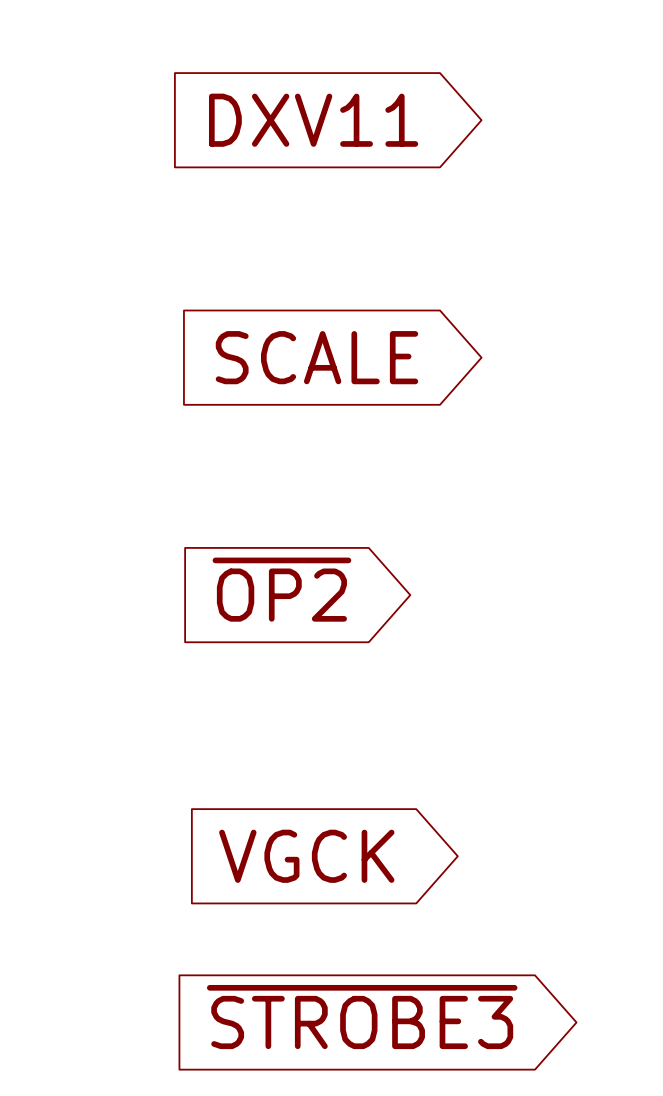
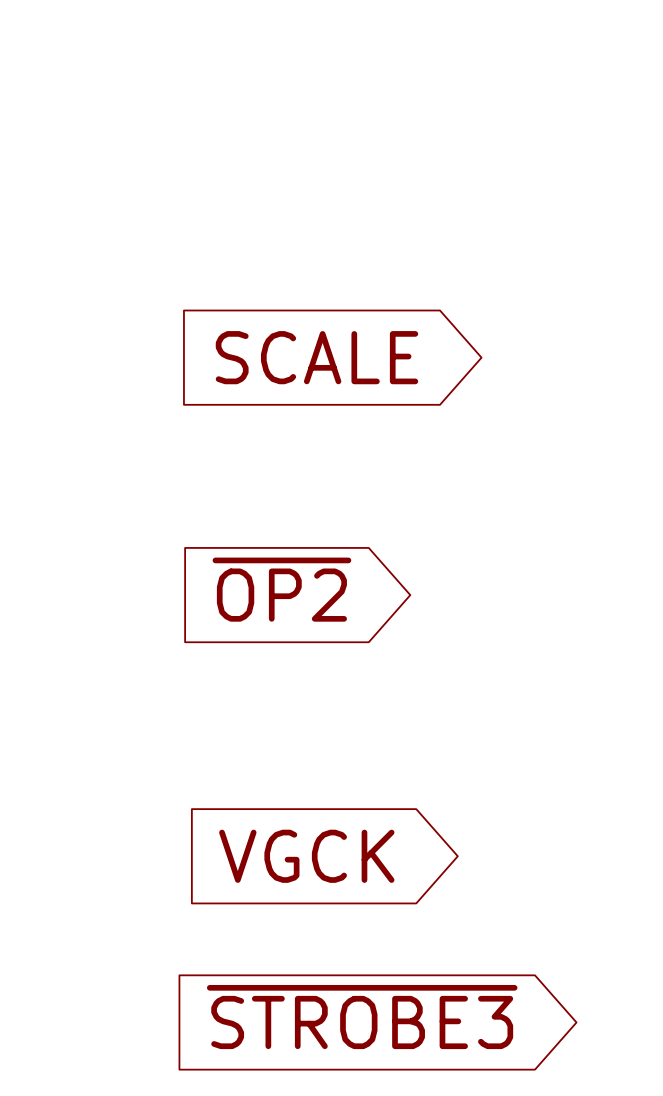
global label: DXV11 (313, 120) -> none

